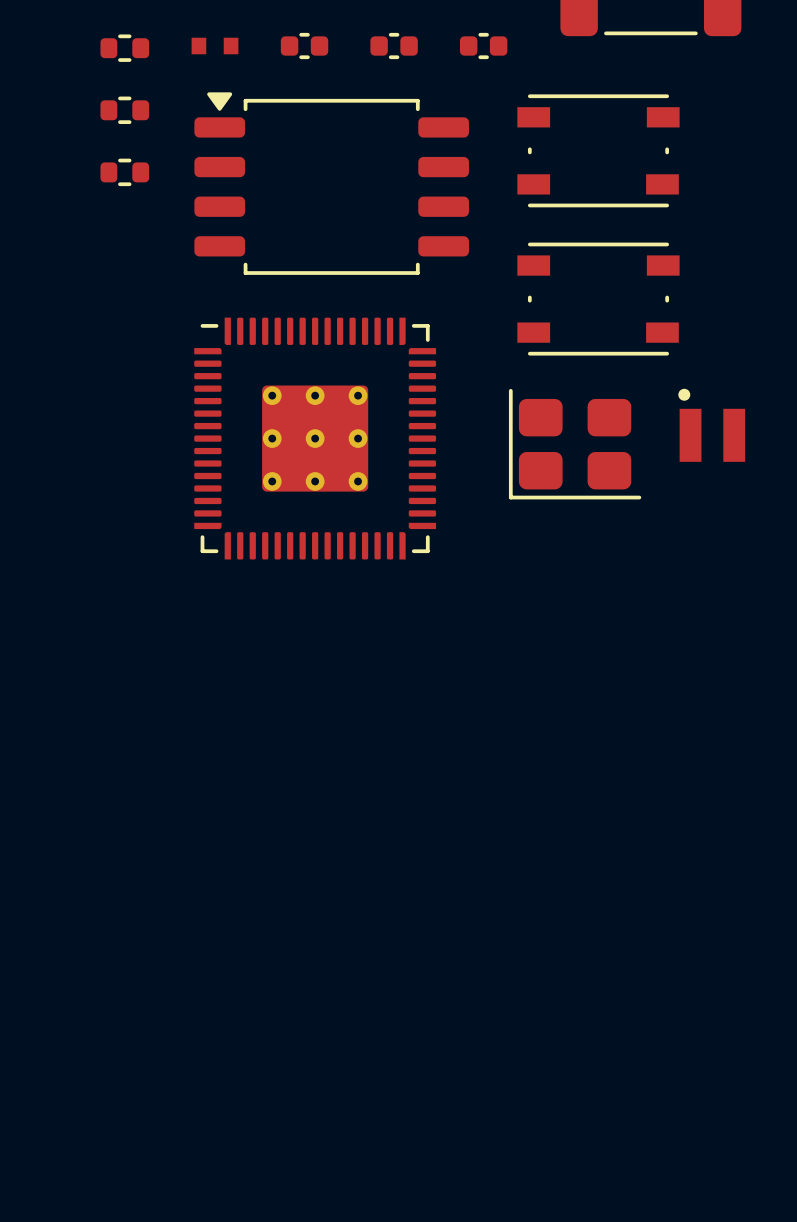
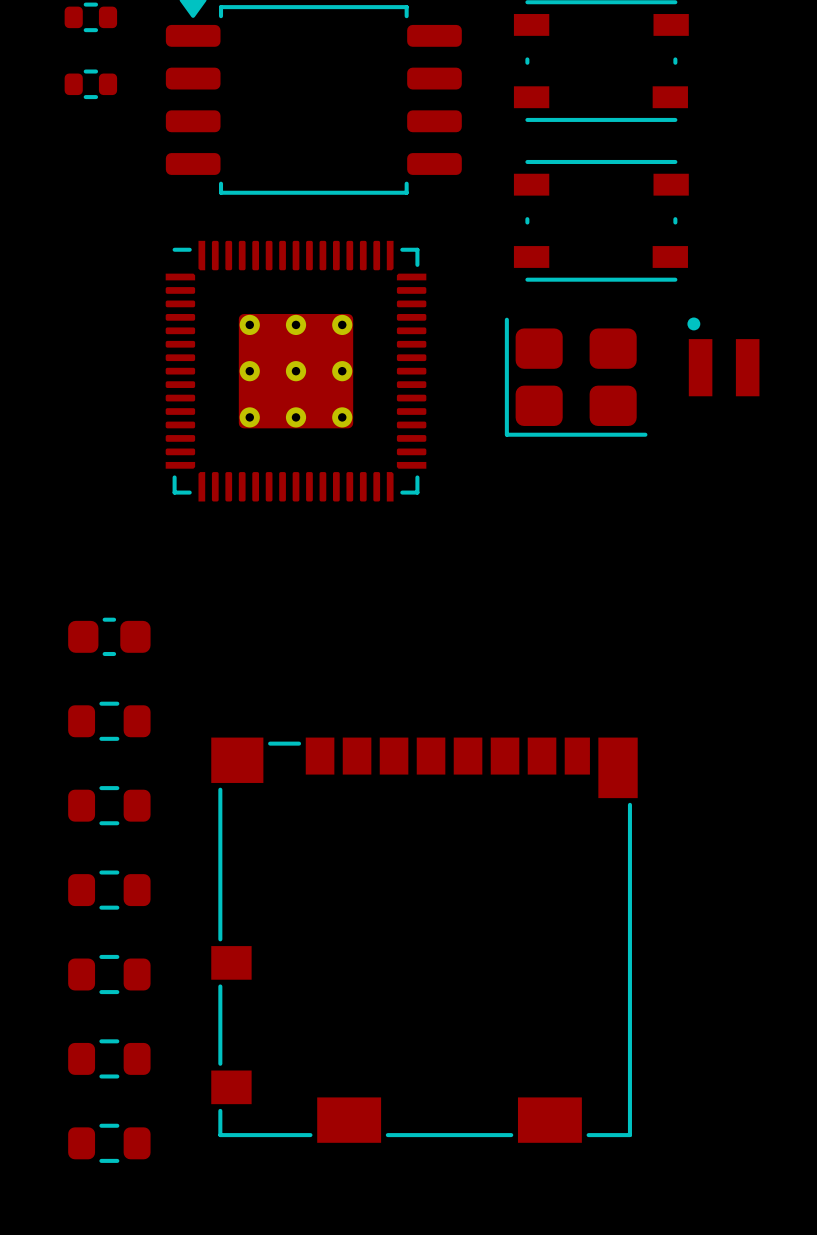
part: none -> (109, 636)
part: none -> (109, 721)
part: none -> (109, 805)
part: none -> (109, 890)
part: none -> (424, 940)
part: none -> (109, 974)
part: none -> (109, 1058)
part: none -> (109, 1143)

